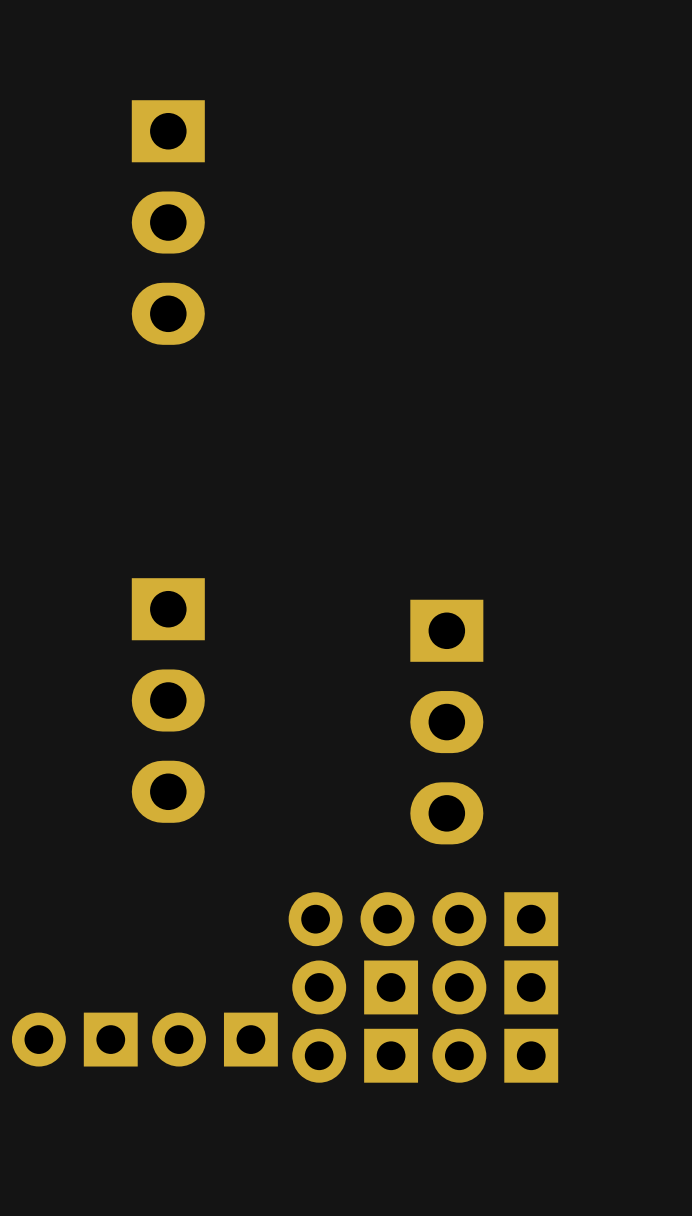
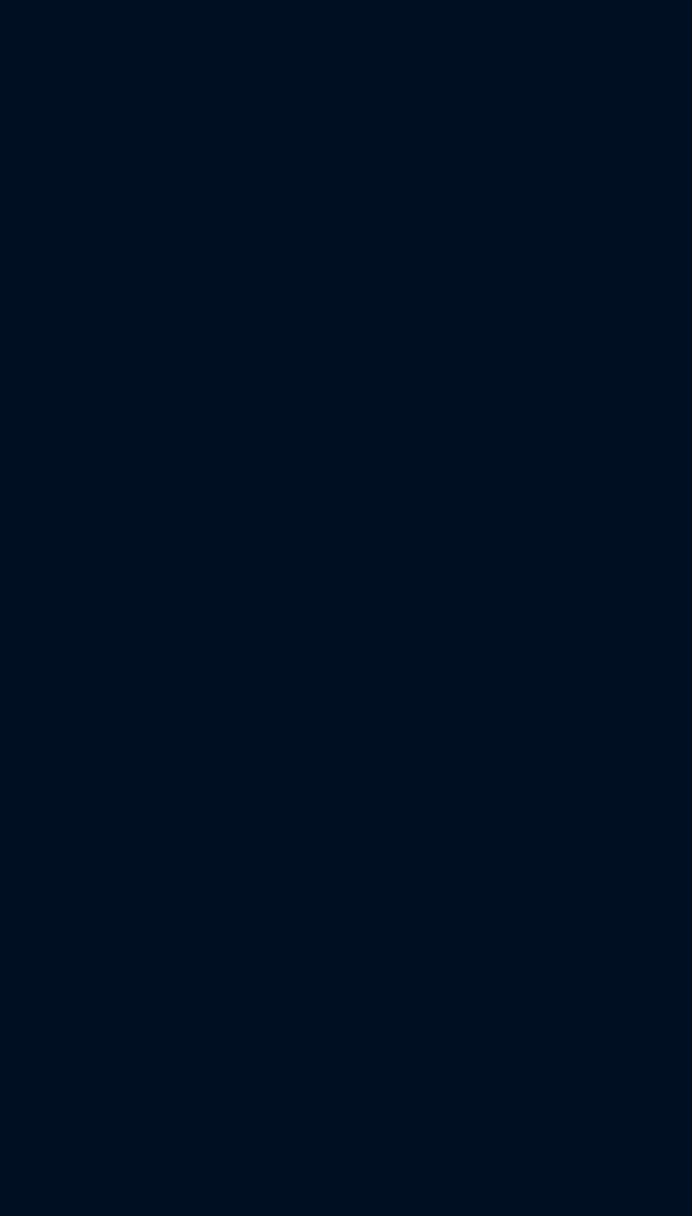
part: (168, 222) -> none
part: (168, 700) -> none
part: (446, 722) -> none
part: (423, 919) -> none
part: (355, 987) -> none
part: (495, 987) -> none
part: (74, 1039) -> none
part: (214, 1039) -> none
part: (355, 1055) -> none
part: (495, 1055) -> none

